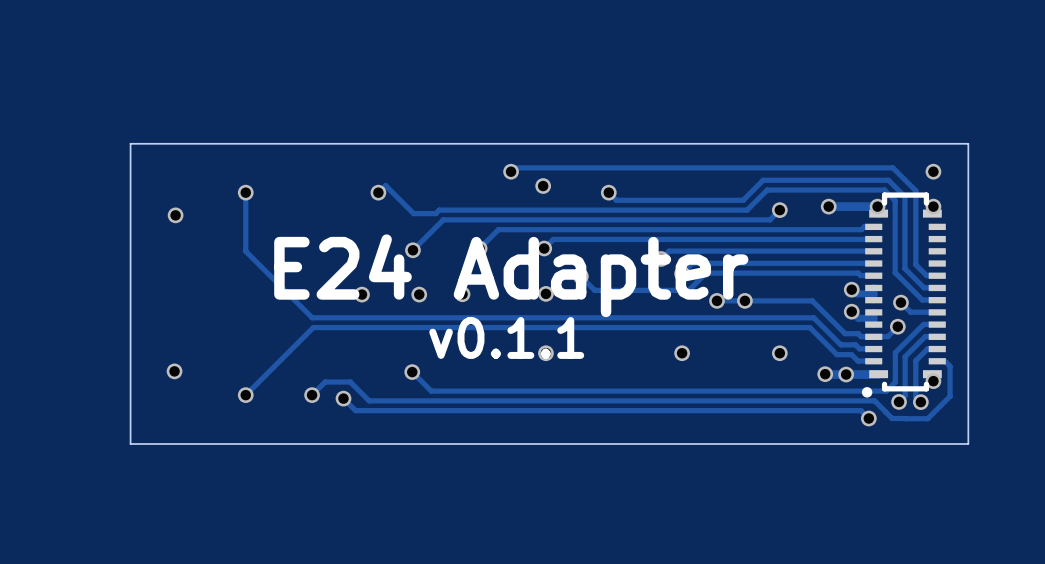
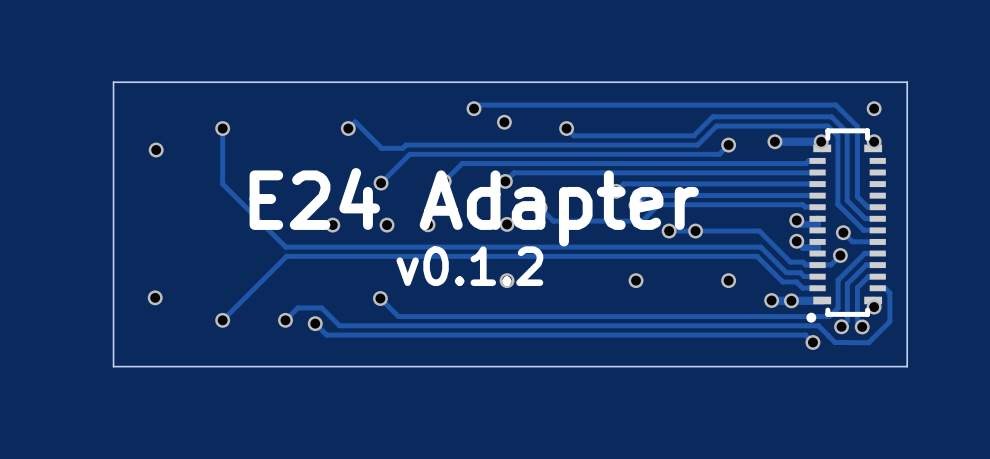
text: v0.1.1 (506, 337) -> v0.1.2 (469, 266)

